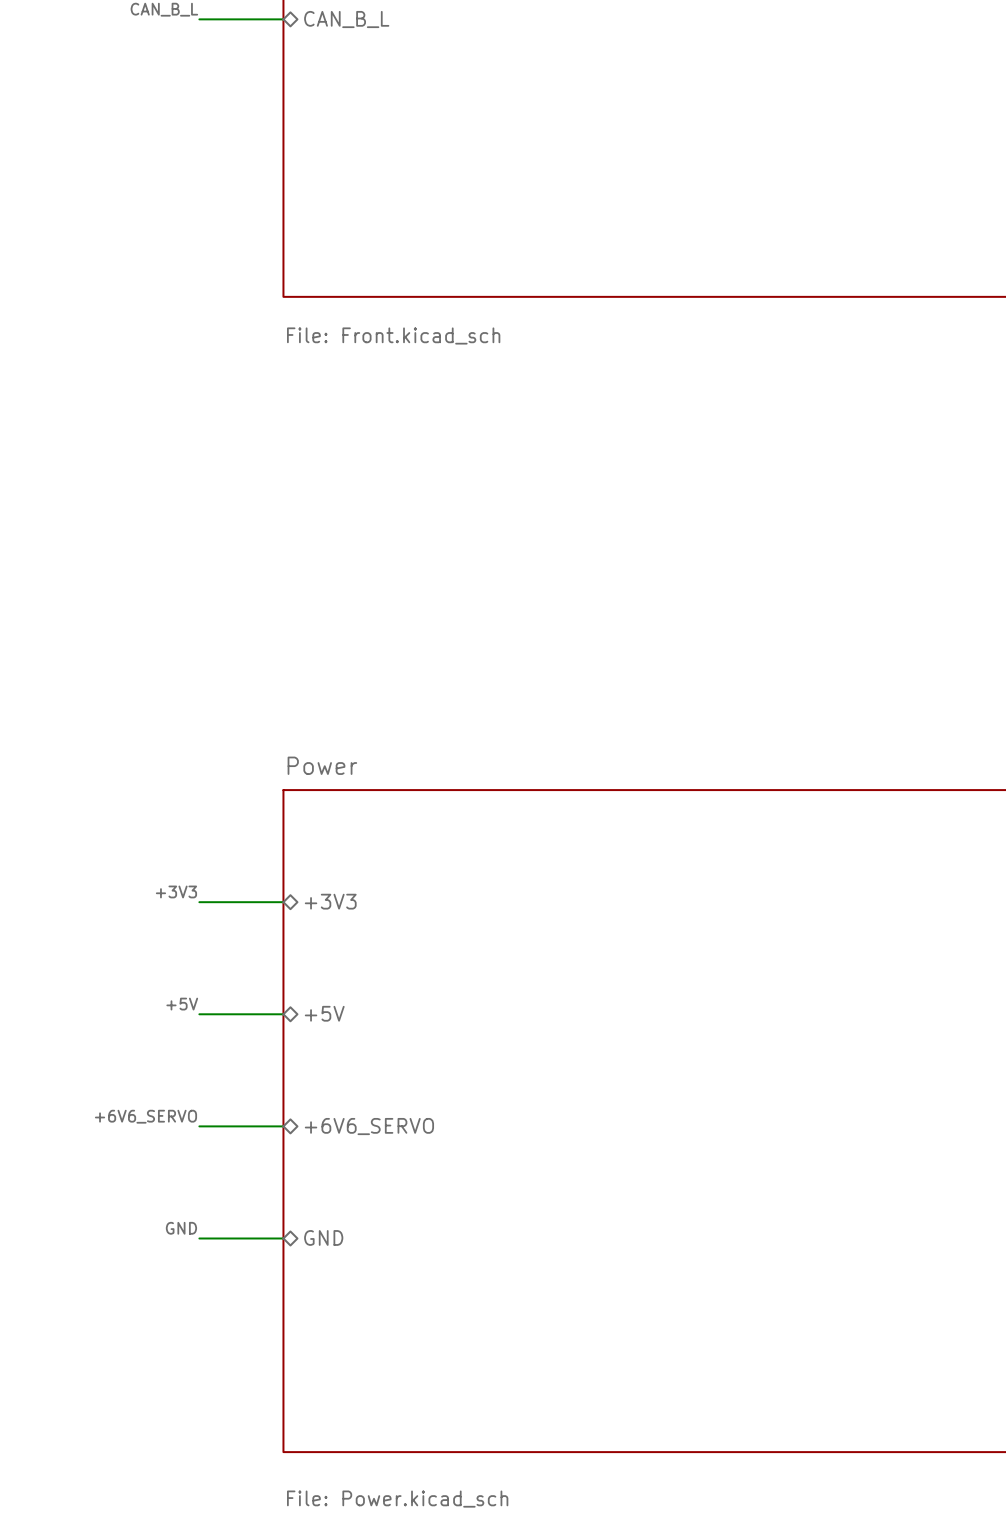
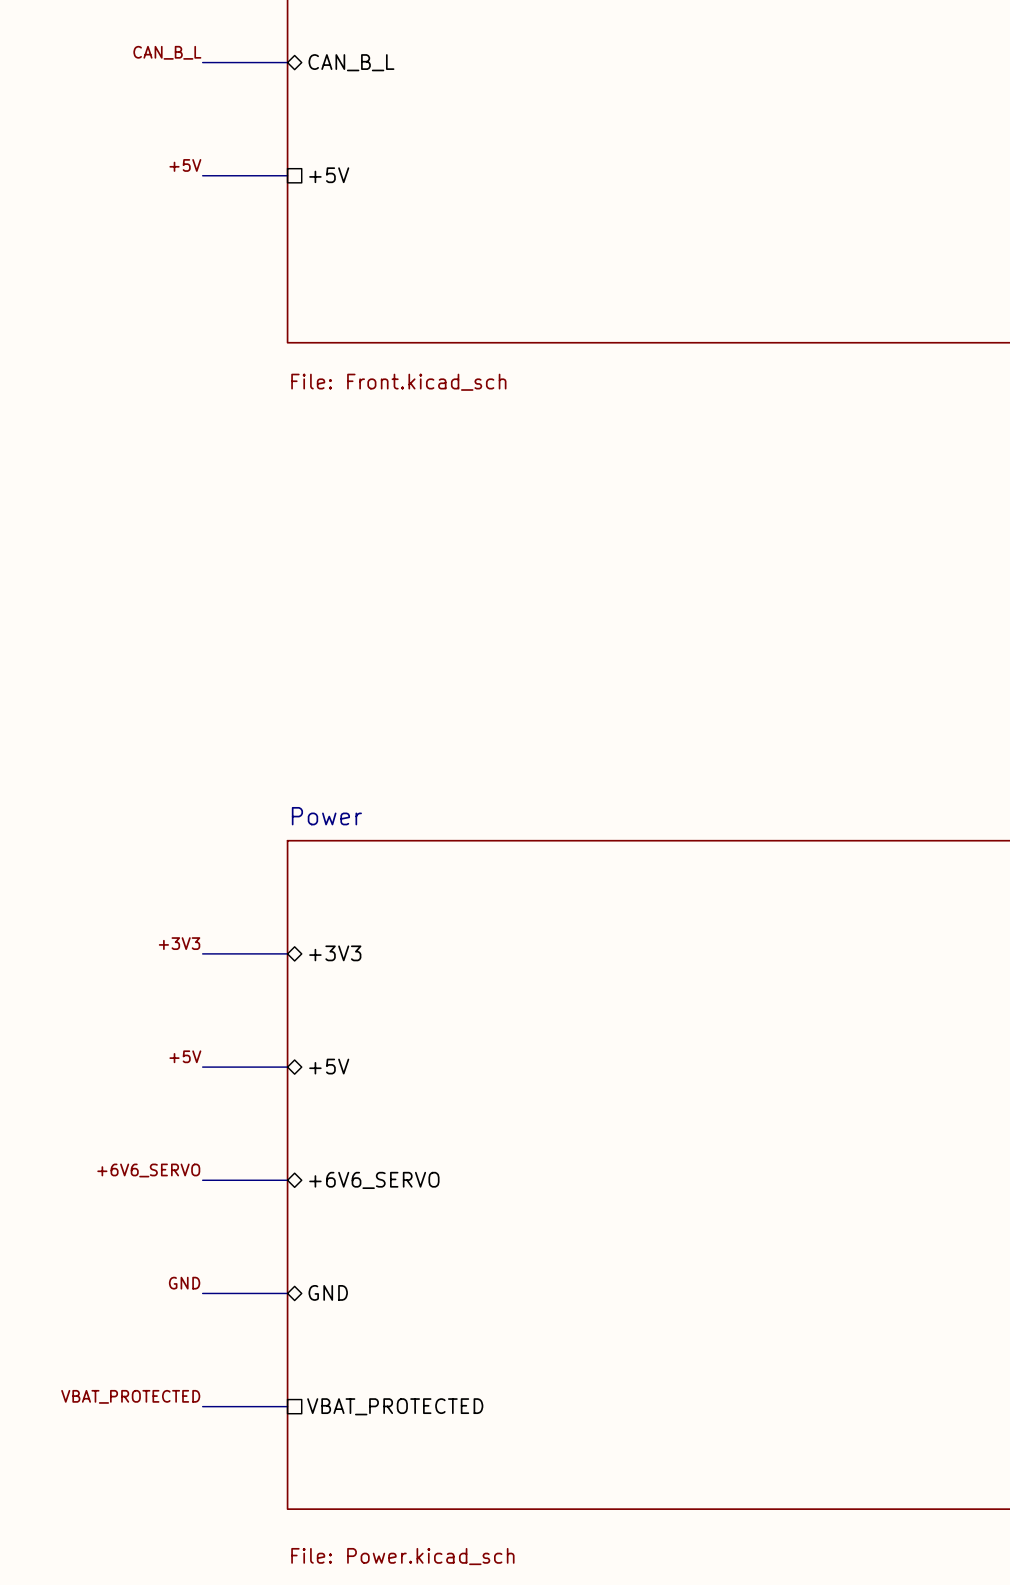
label: none -> +5V (185, 165)
sheet pin: none -> +5V (329, 175)
wire: none -> (202, 175) (287, 175)
label: none -> VBAT_PROTECTED (130, 1396)
wire: none -> (202, 1406) (287, 1406)
sheet pin: none -> VBAT_PROTECTED (395, 1406)

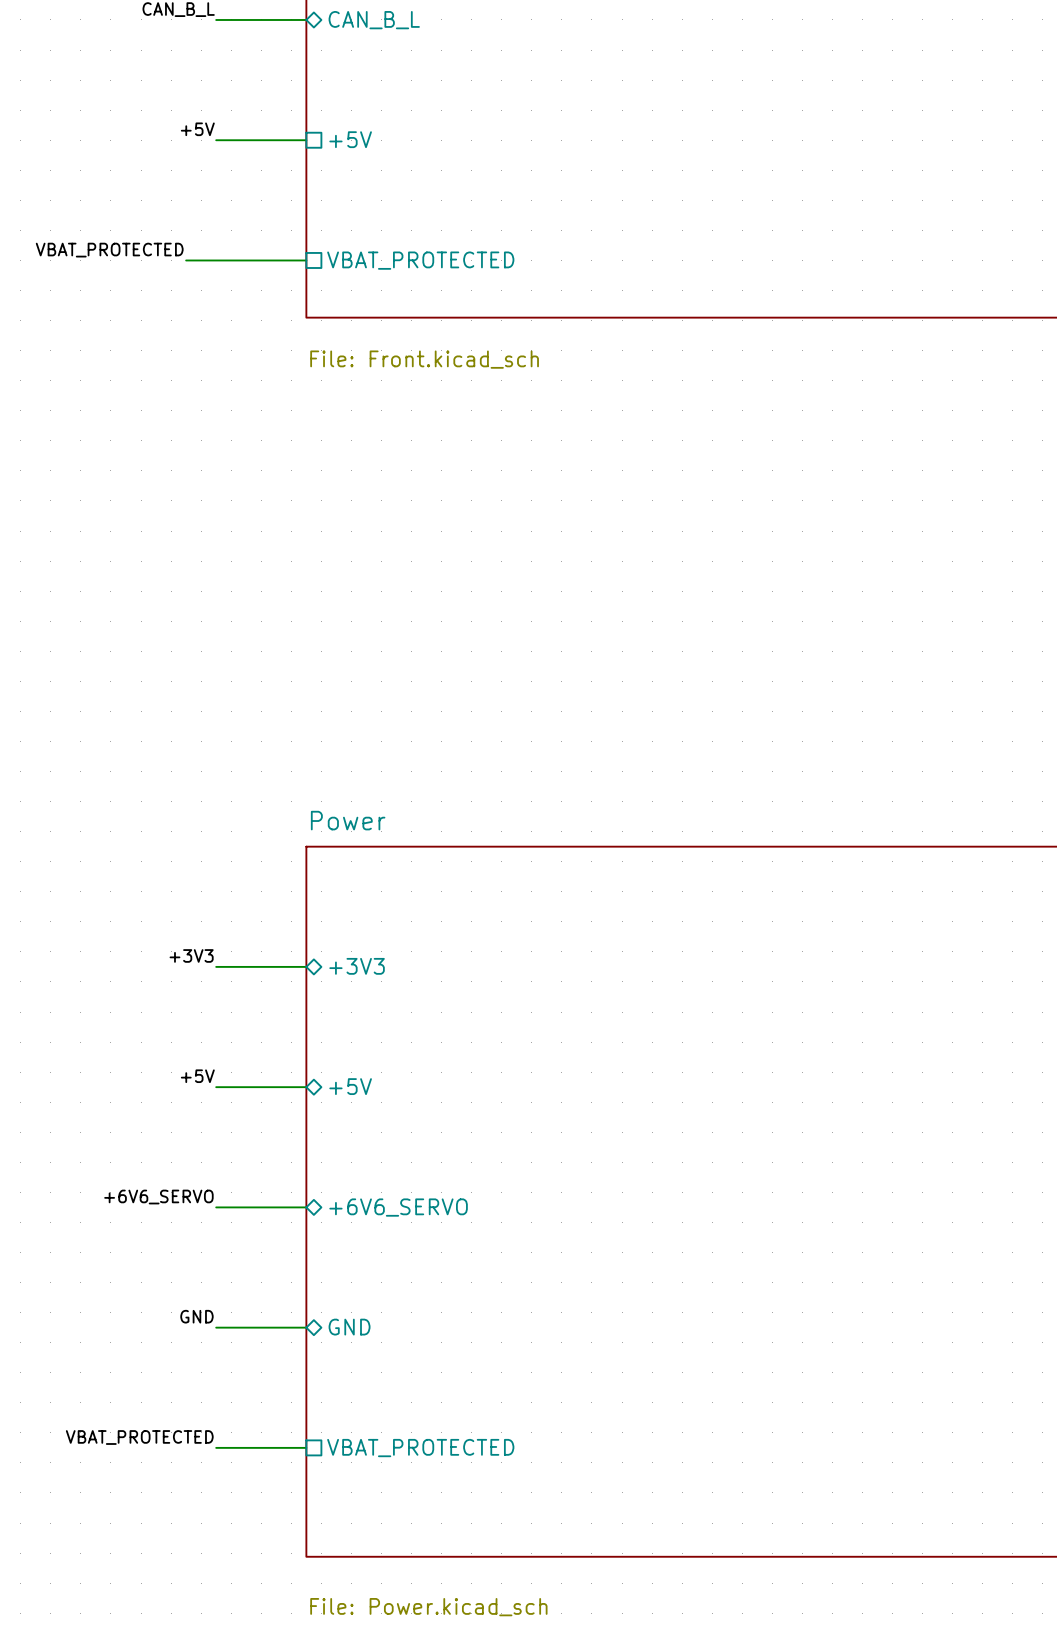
label: none -> VBAT_PROTECTED (109, 250)
wire: none -> (186, 260) (306, 260)
sheet pin: none -> VBAT_PROTECTED (420, 260)

